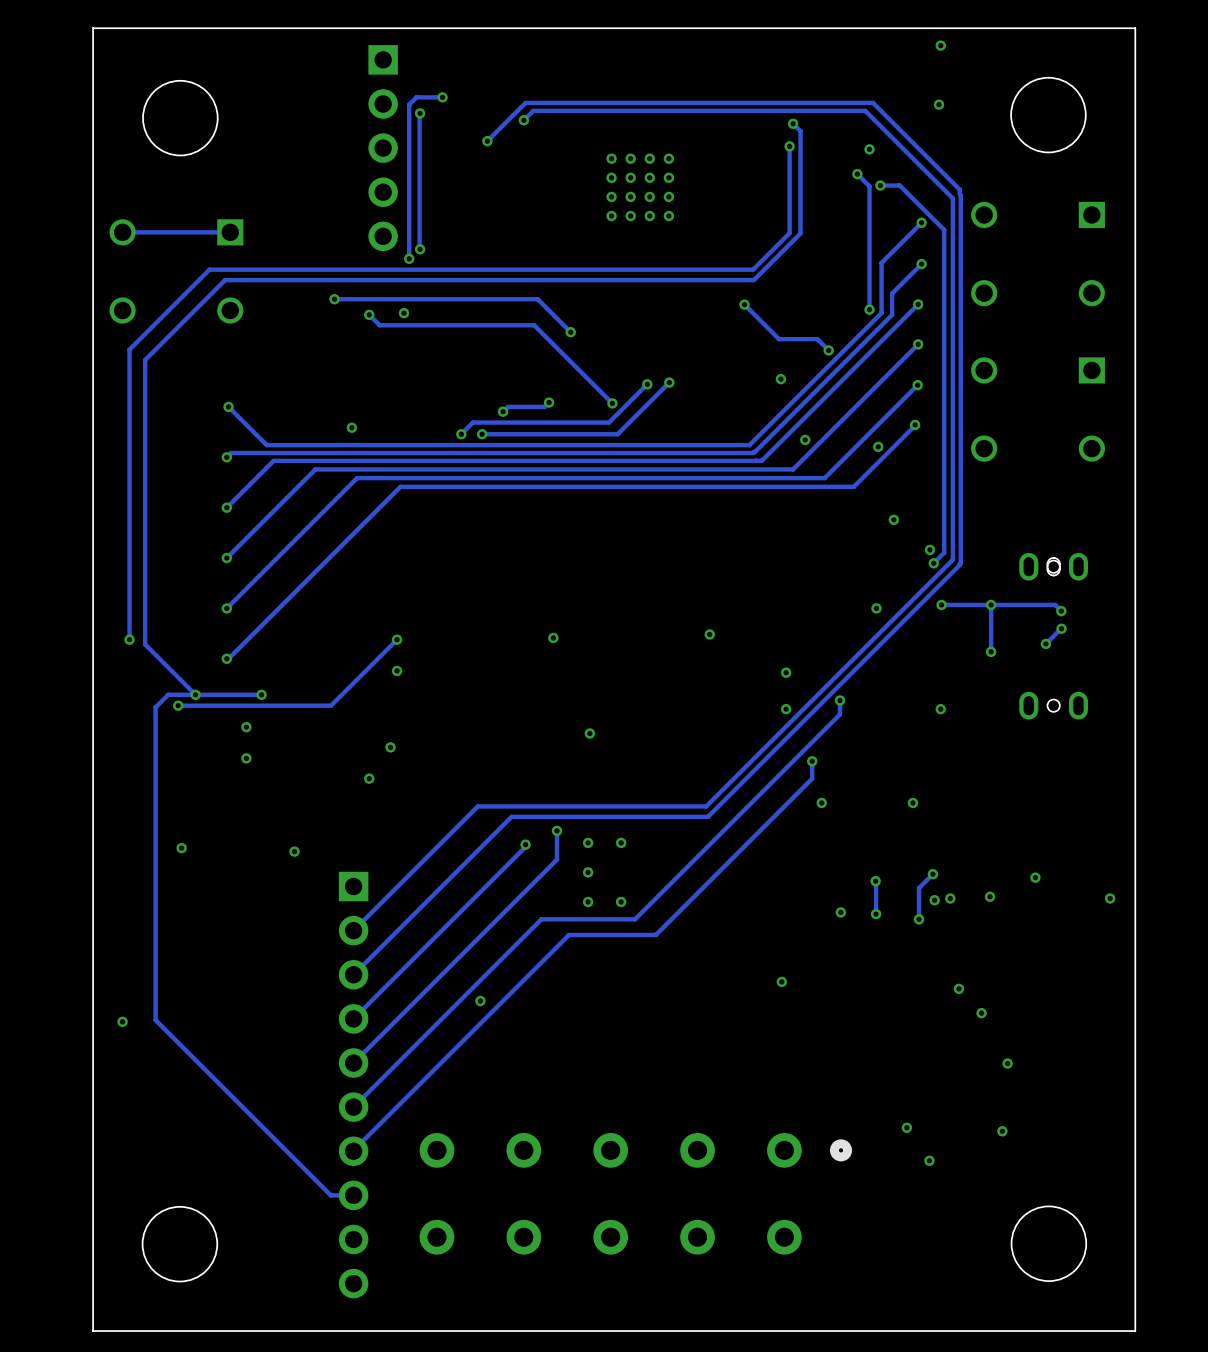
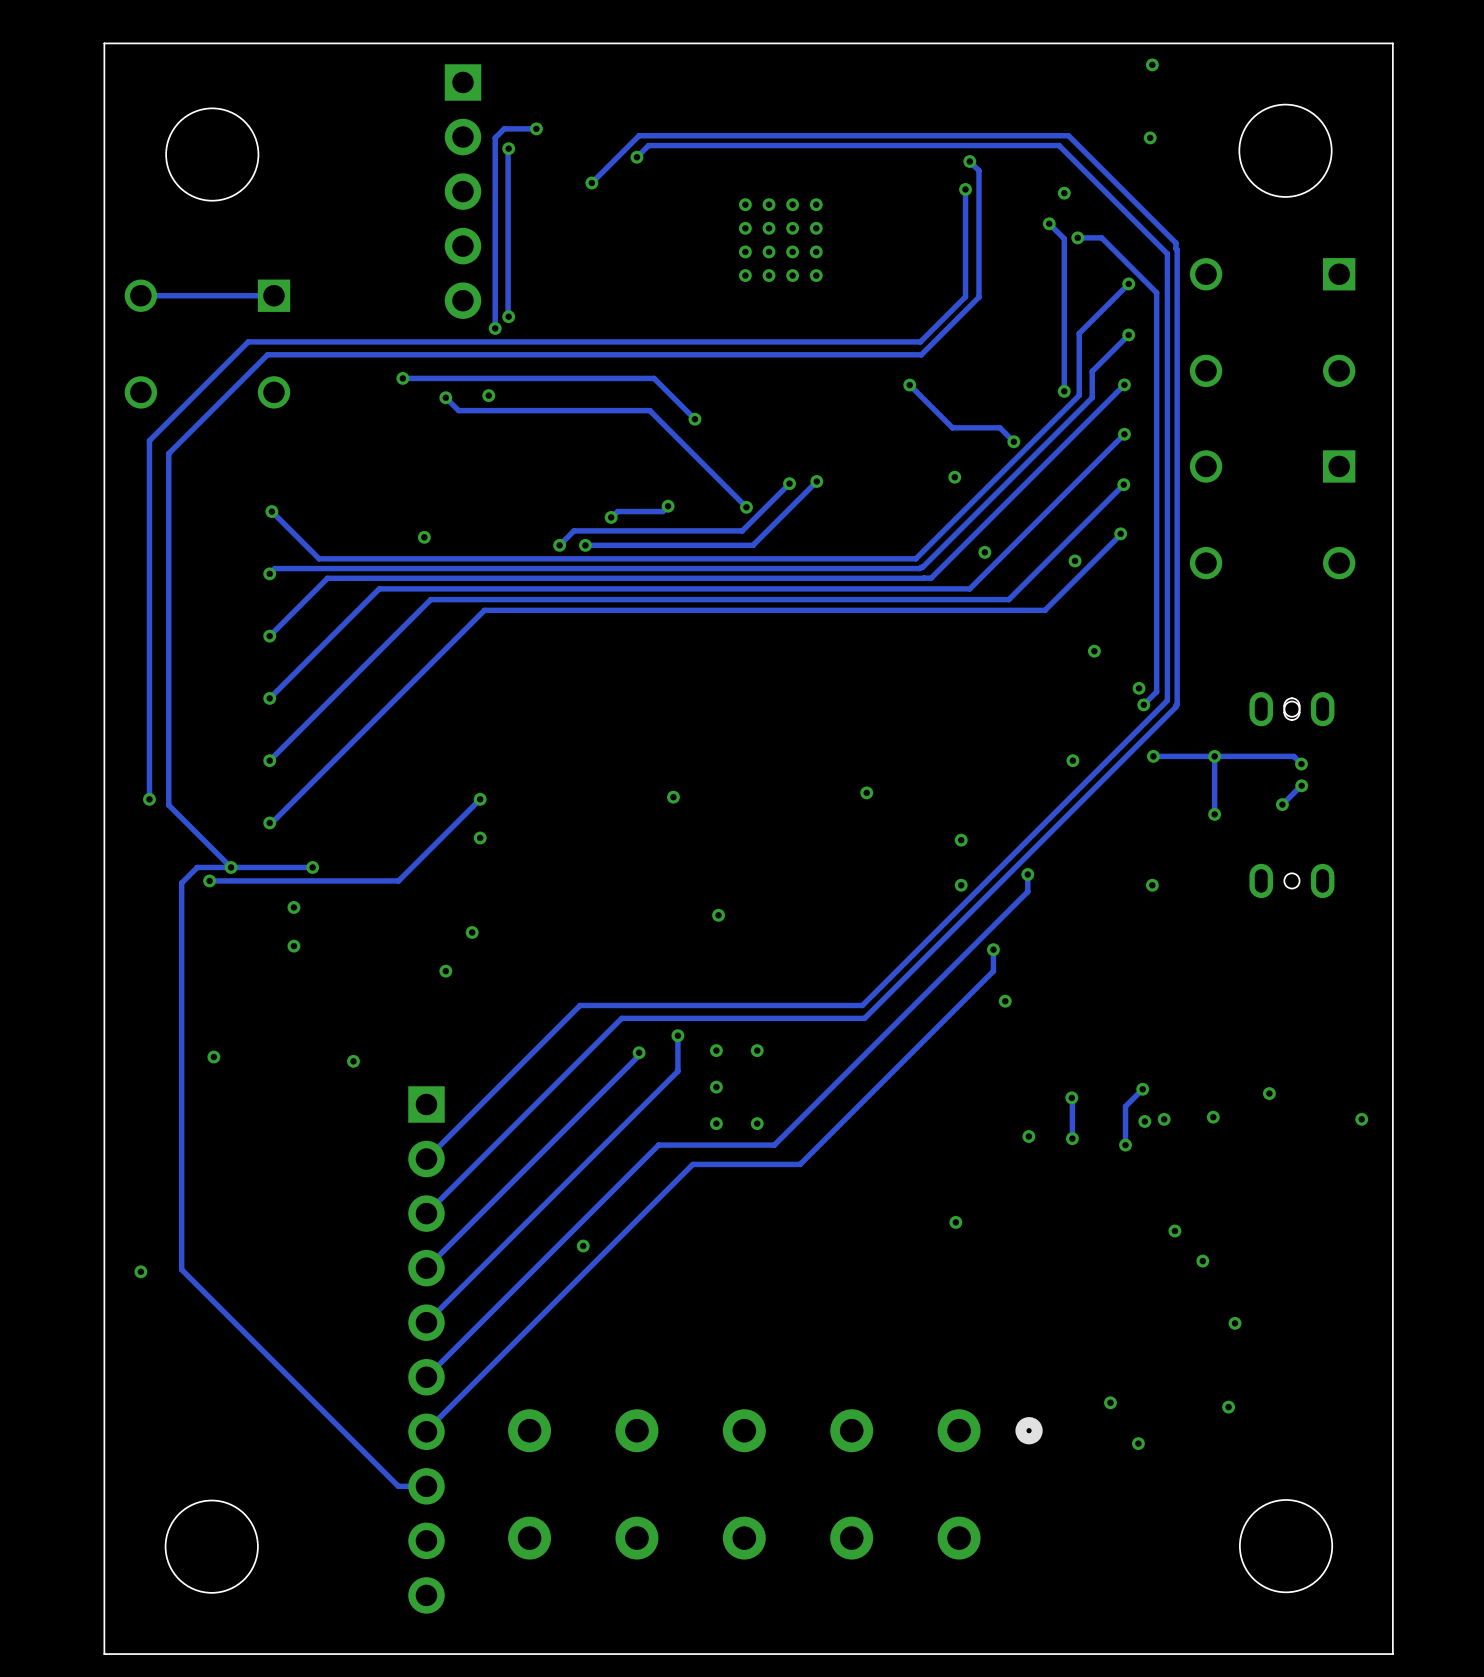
via: (912, 802) -> none

